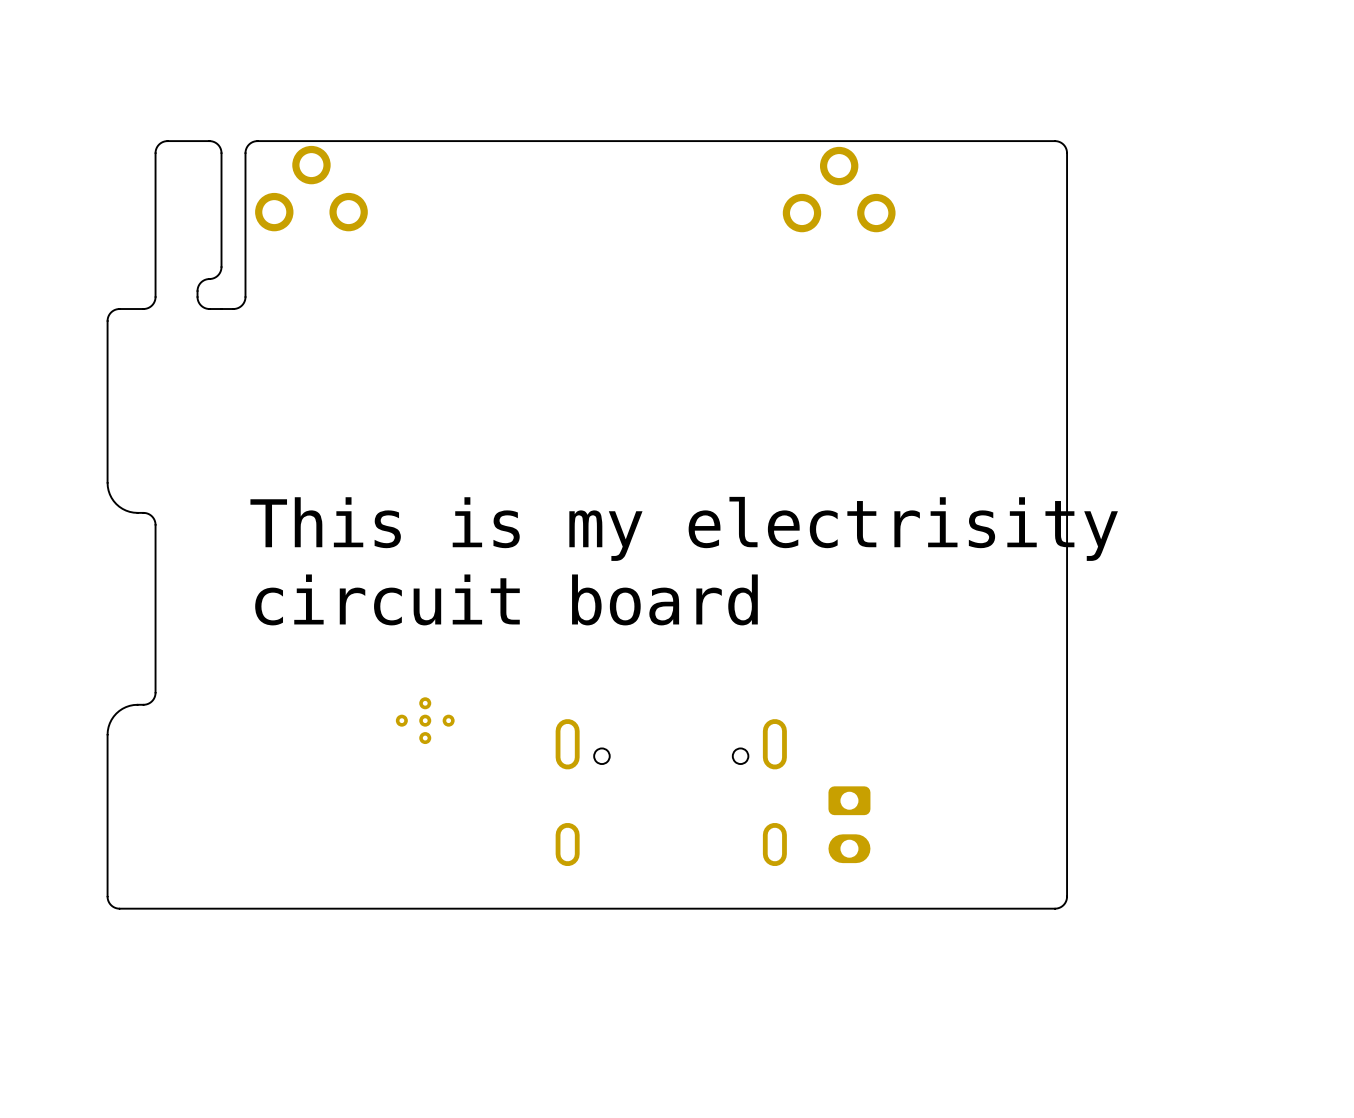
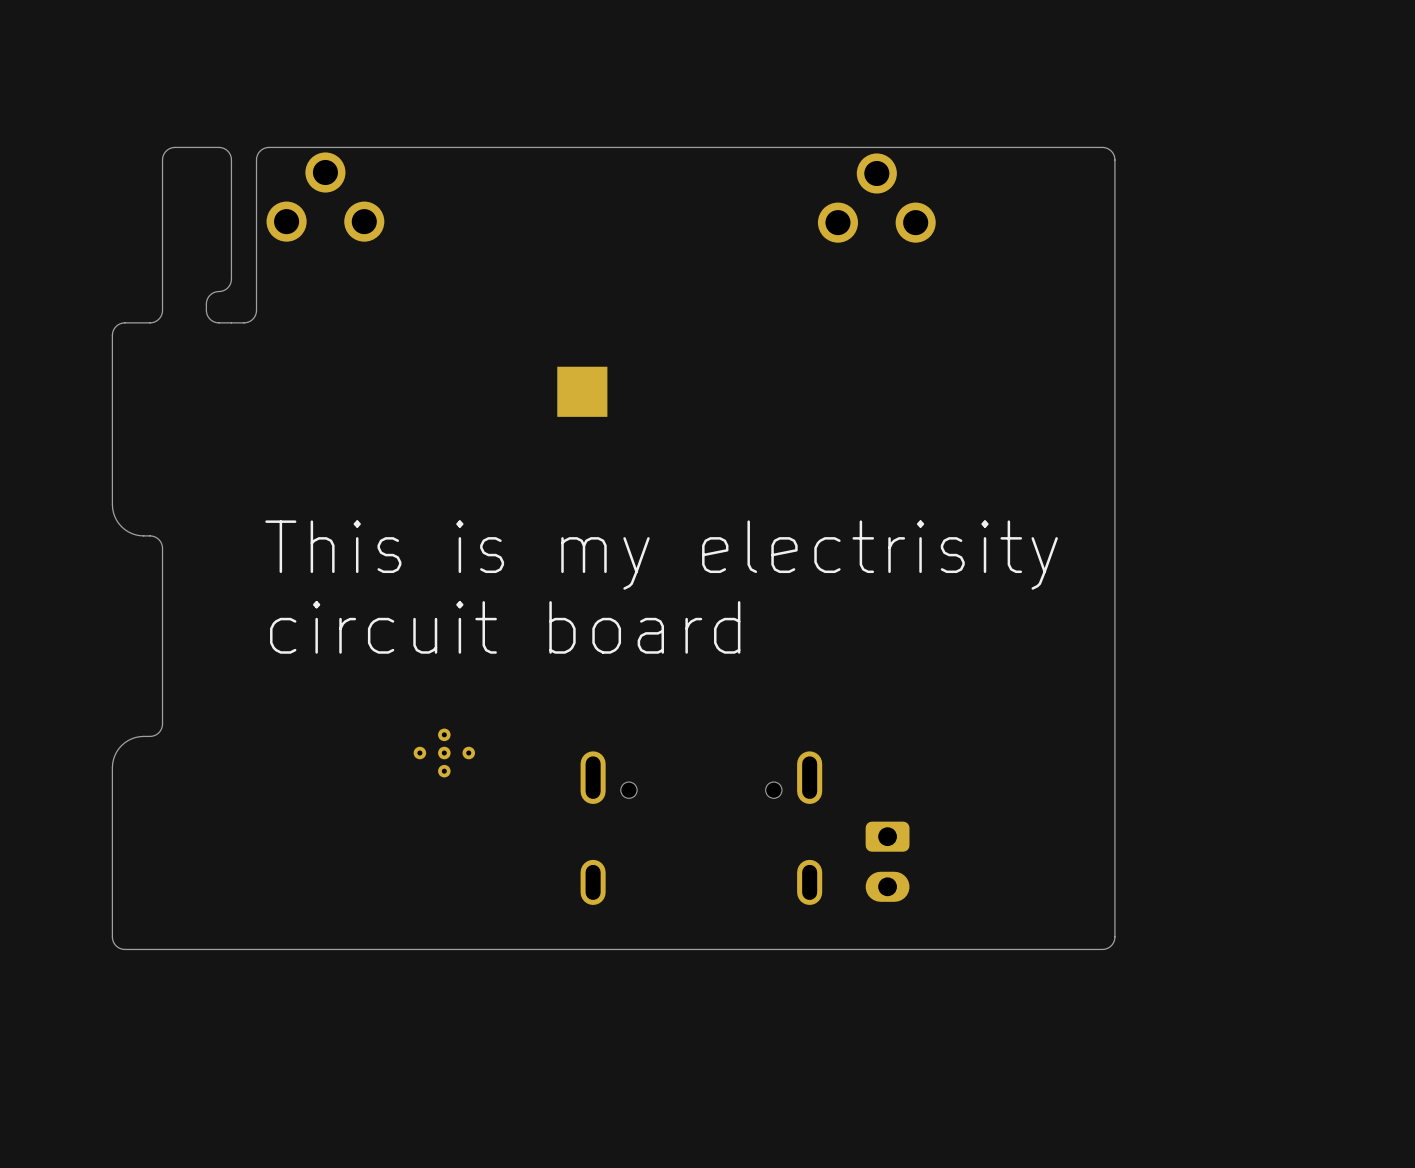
part: none -> (582, 391)

